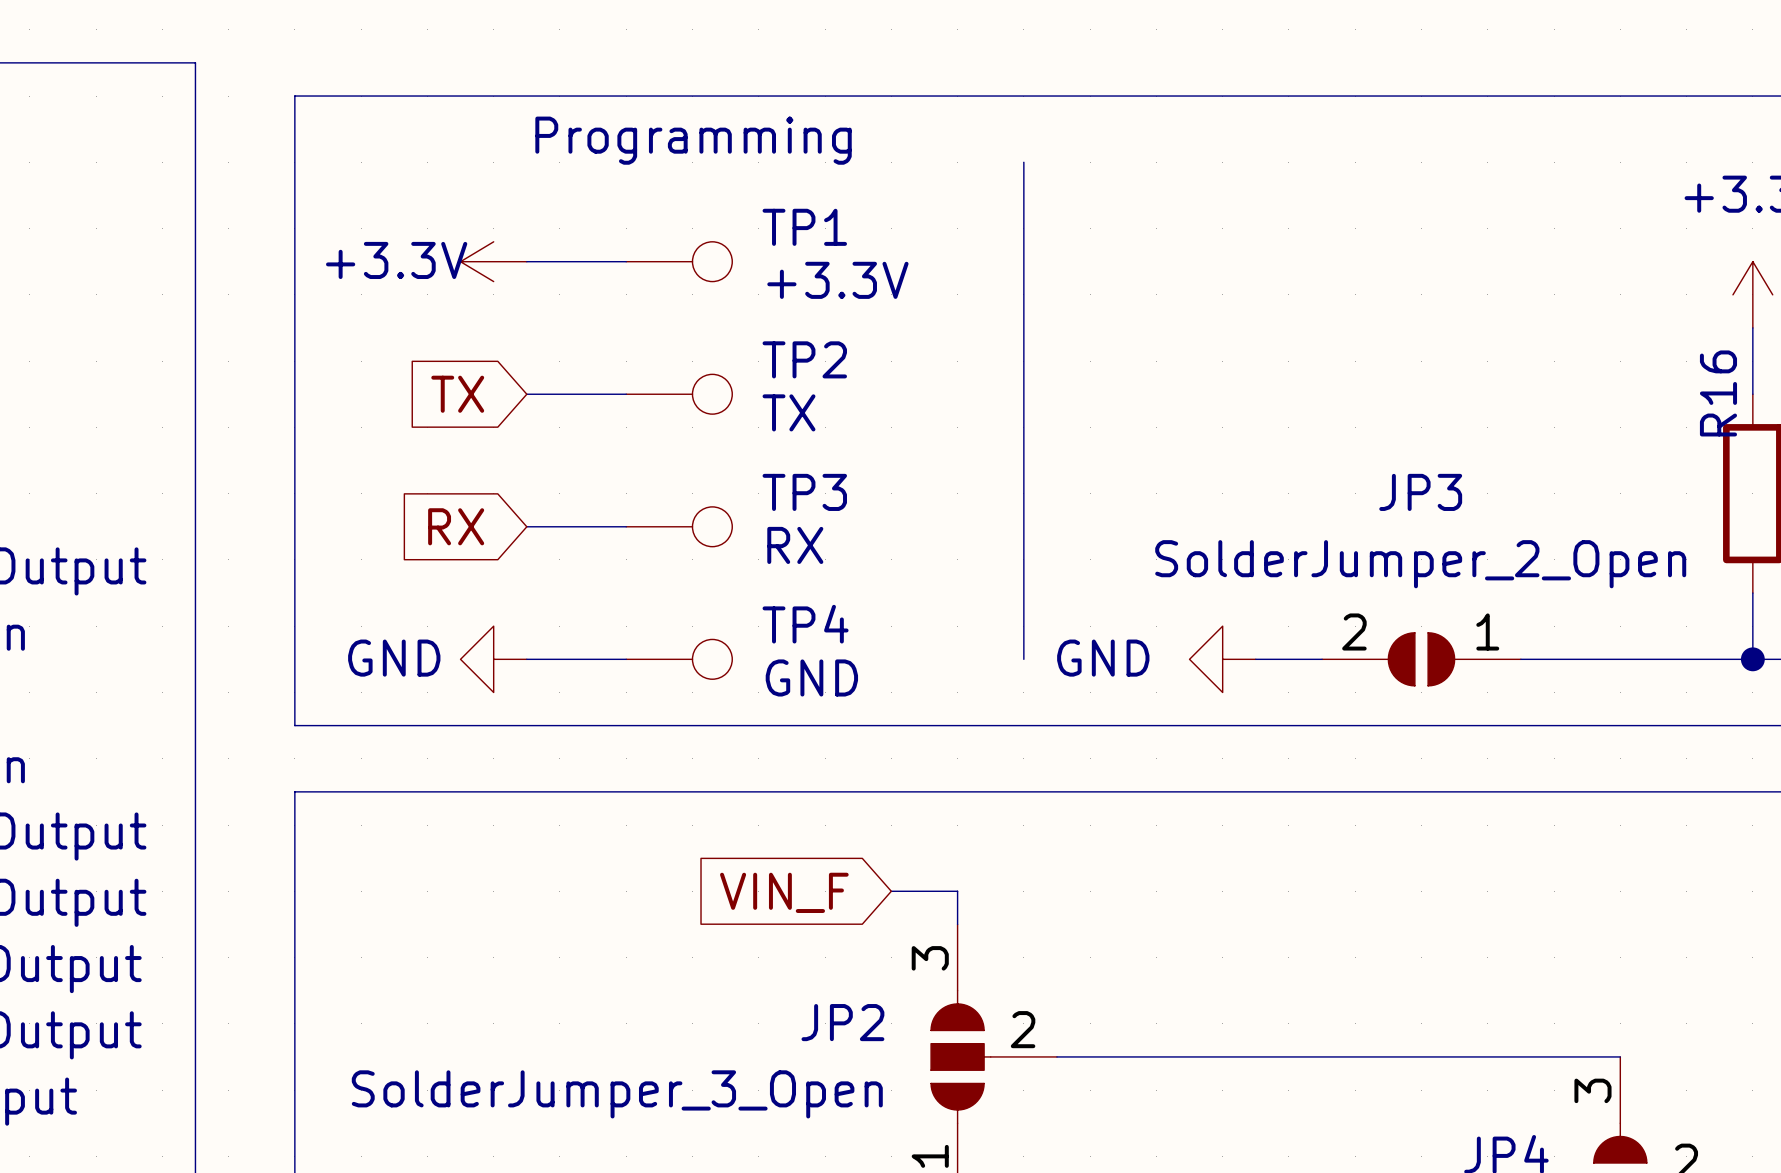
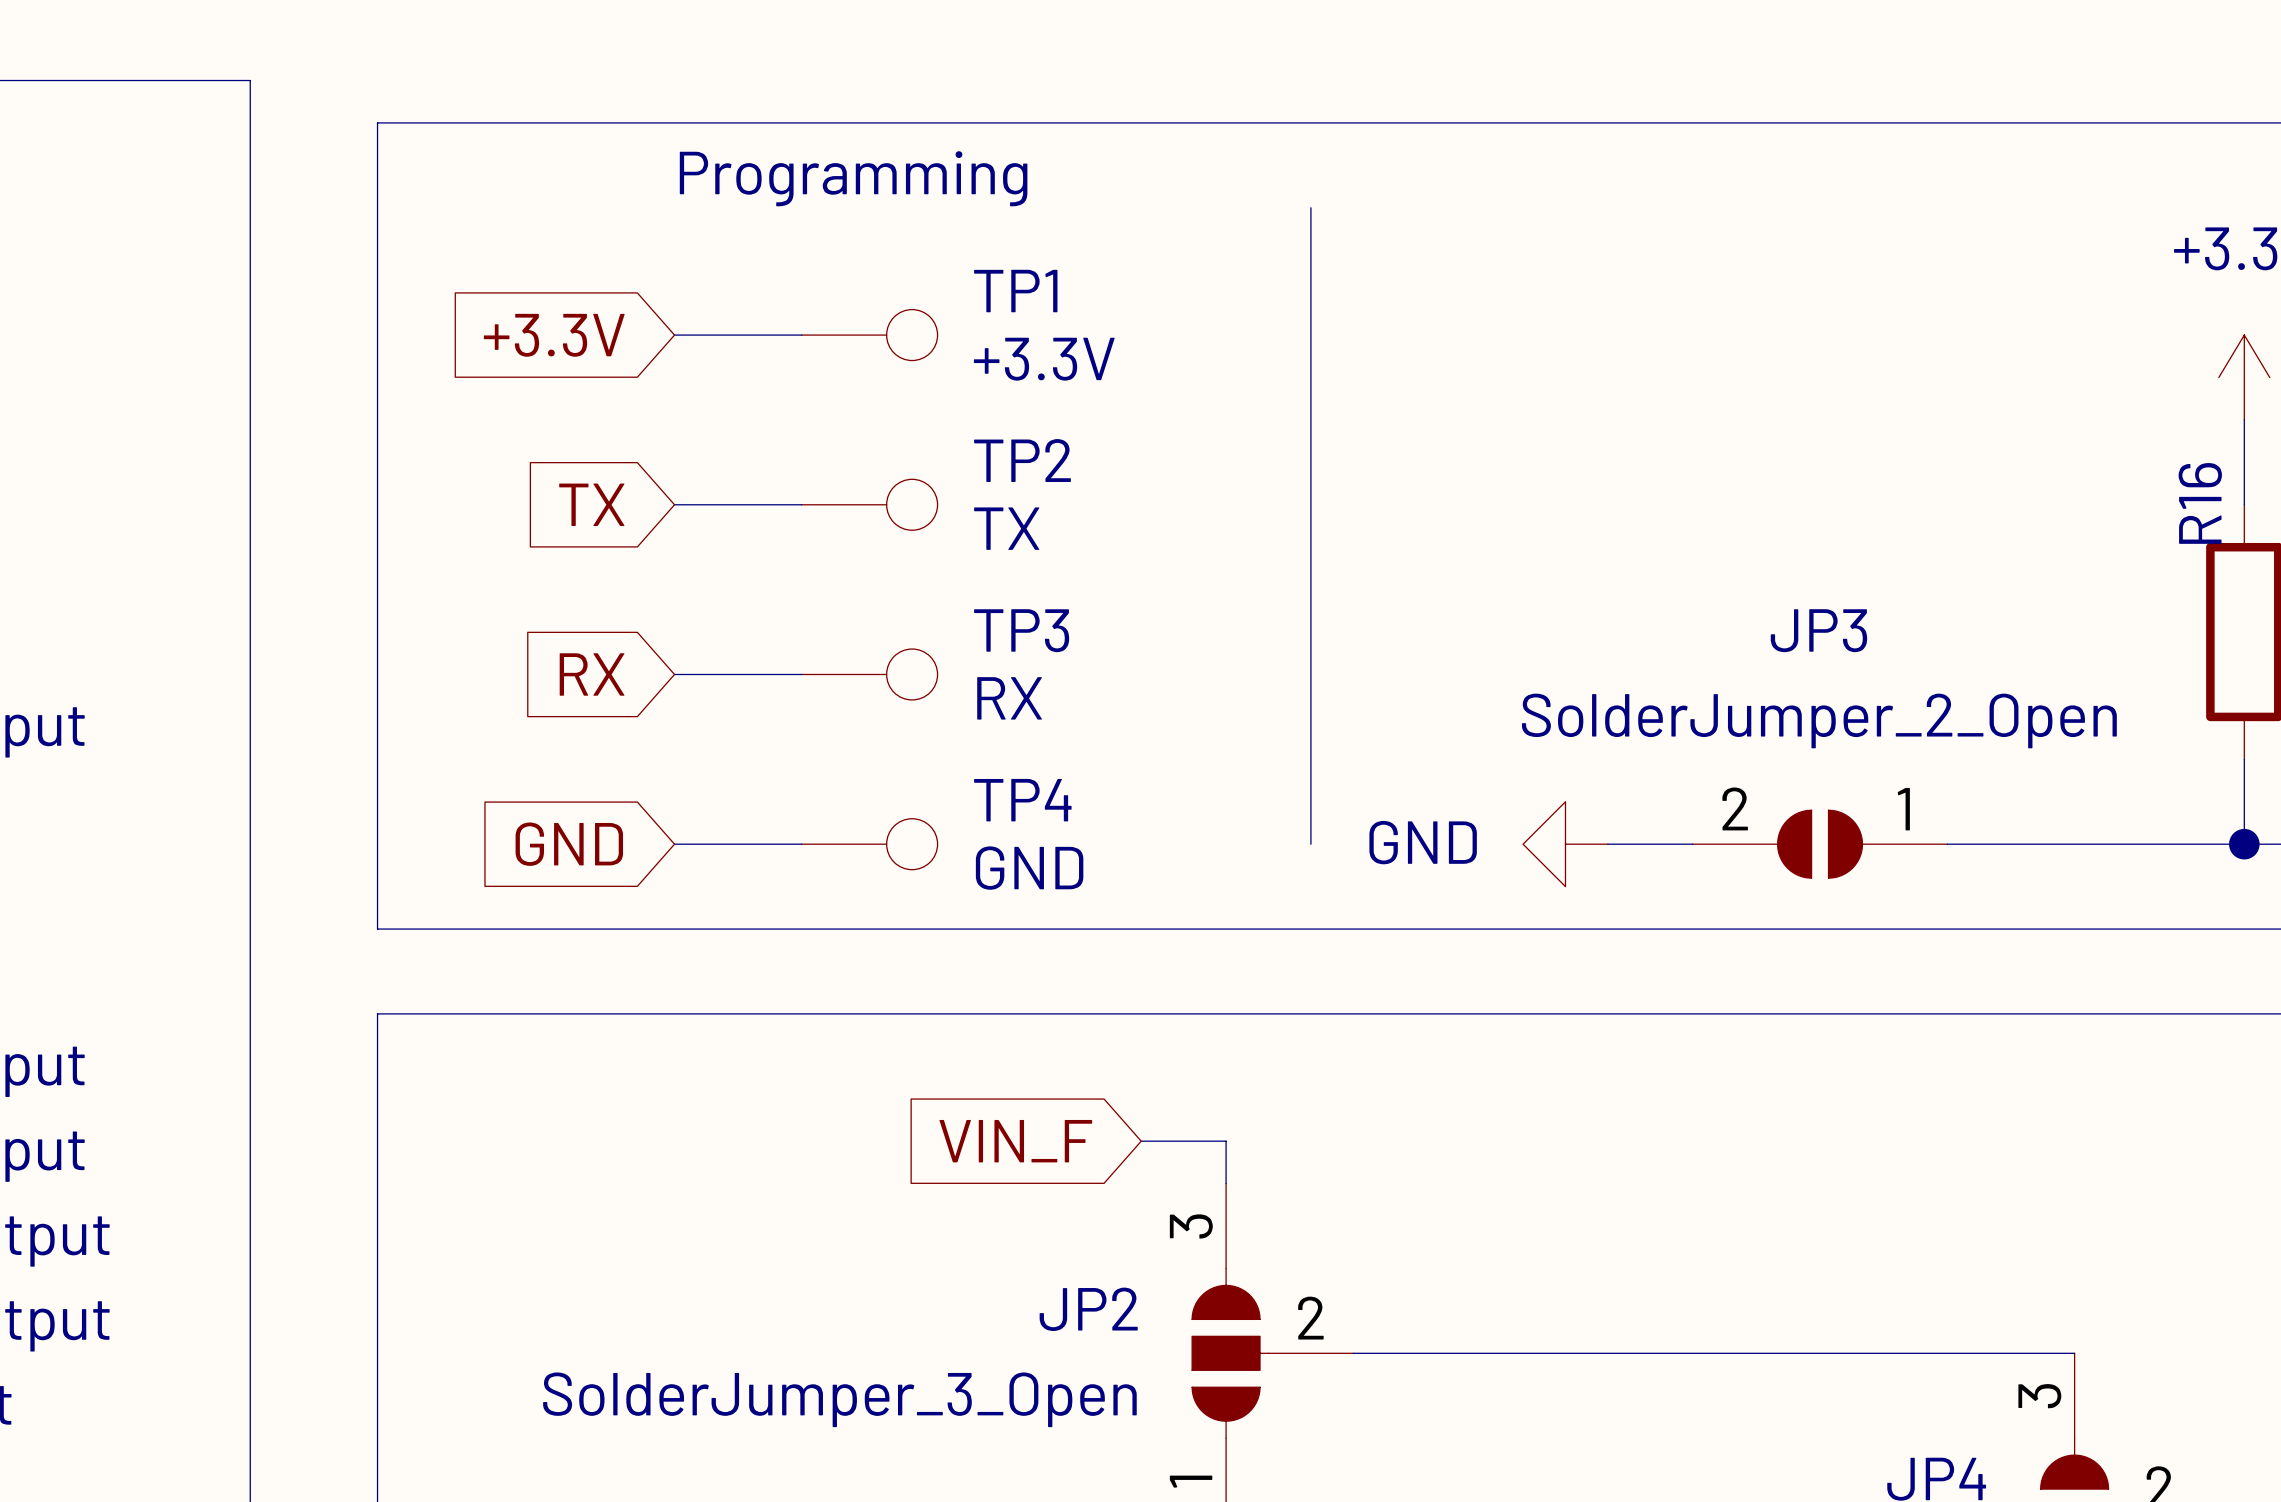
global label: none -> +3.3V (554, 335)
power symbol: +3.3V (493, 261) -> none
global label: none -> GND (569, 844)
power symbol: GND (493, 659) -> none

